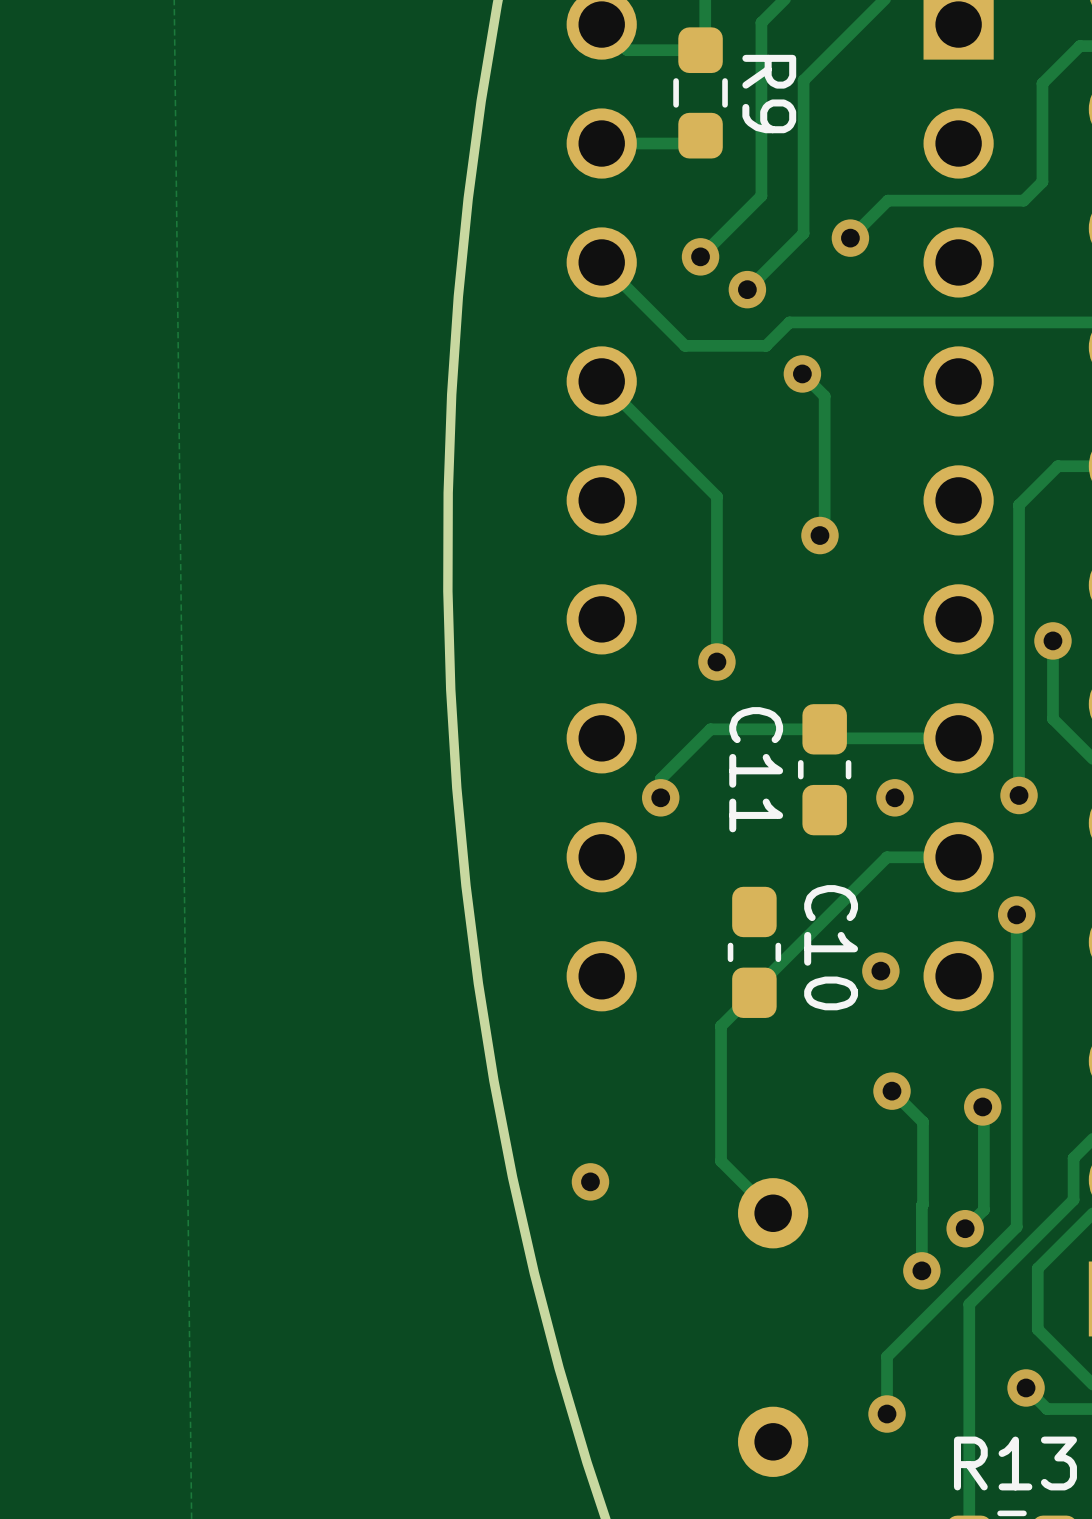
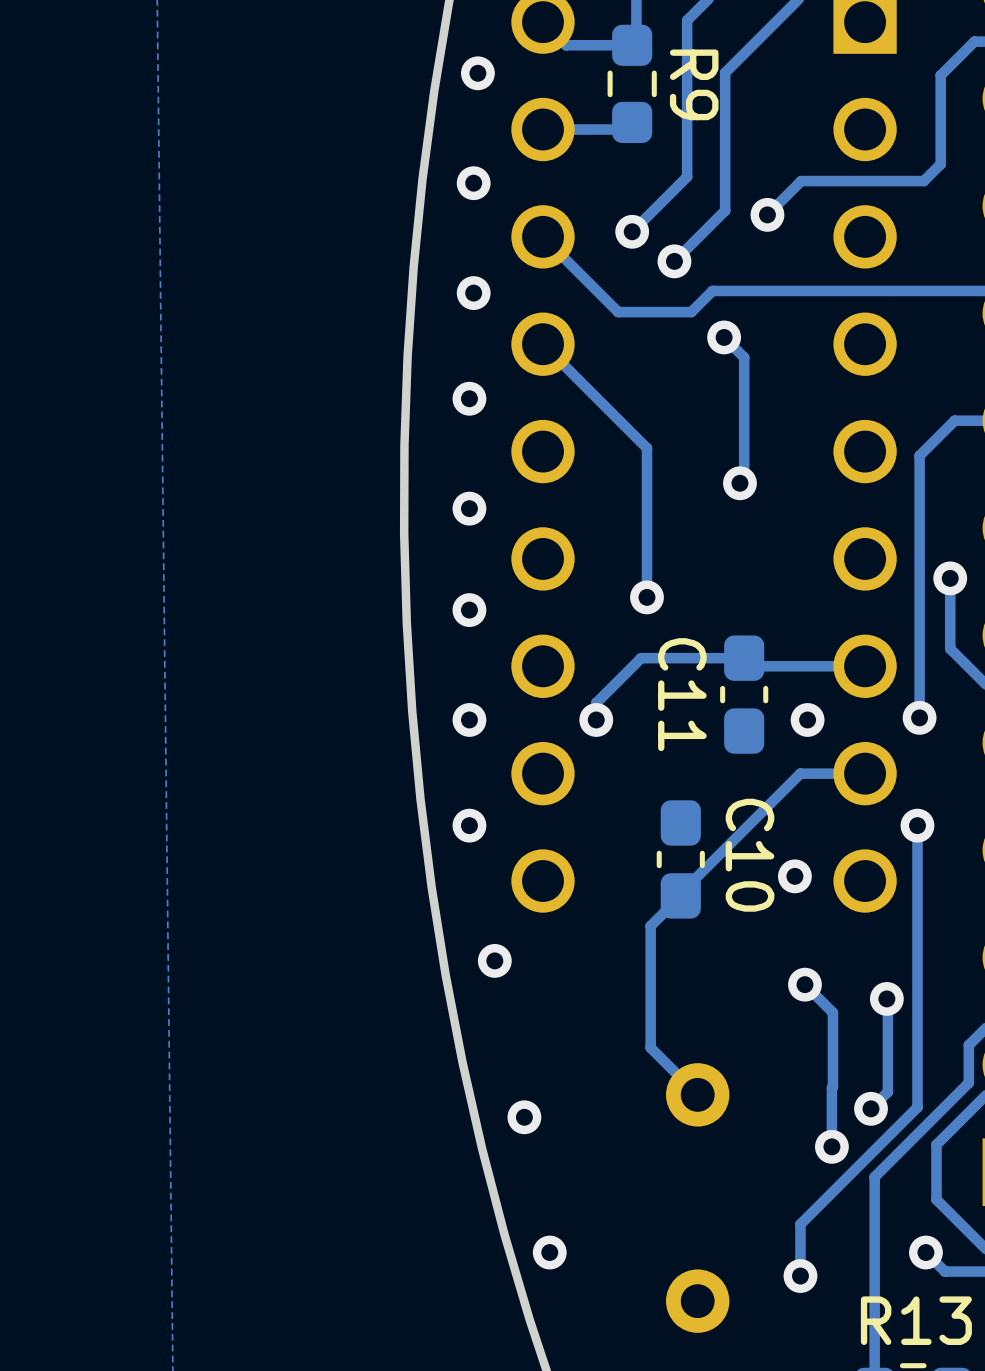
via: none -> (477, 73)
via: none -> (473, 183)
via: none -> (473, 293)
via: none -> (469, 398)
via: none -> (469, 508)
via: none -> (469, 610)
via: none -> (469, 719)
via: none -> (469, 825)
via: none -> (494, 960)
via position: (590, 1181) -> (524, 1117)
via: none -> (549, 1252)

